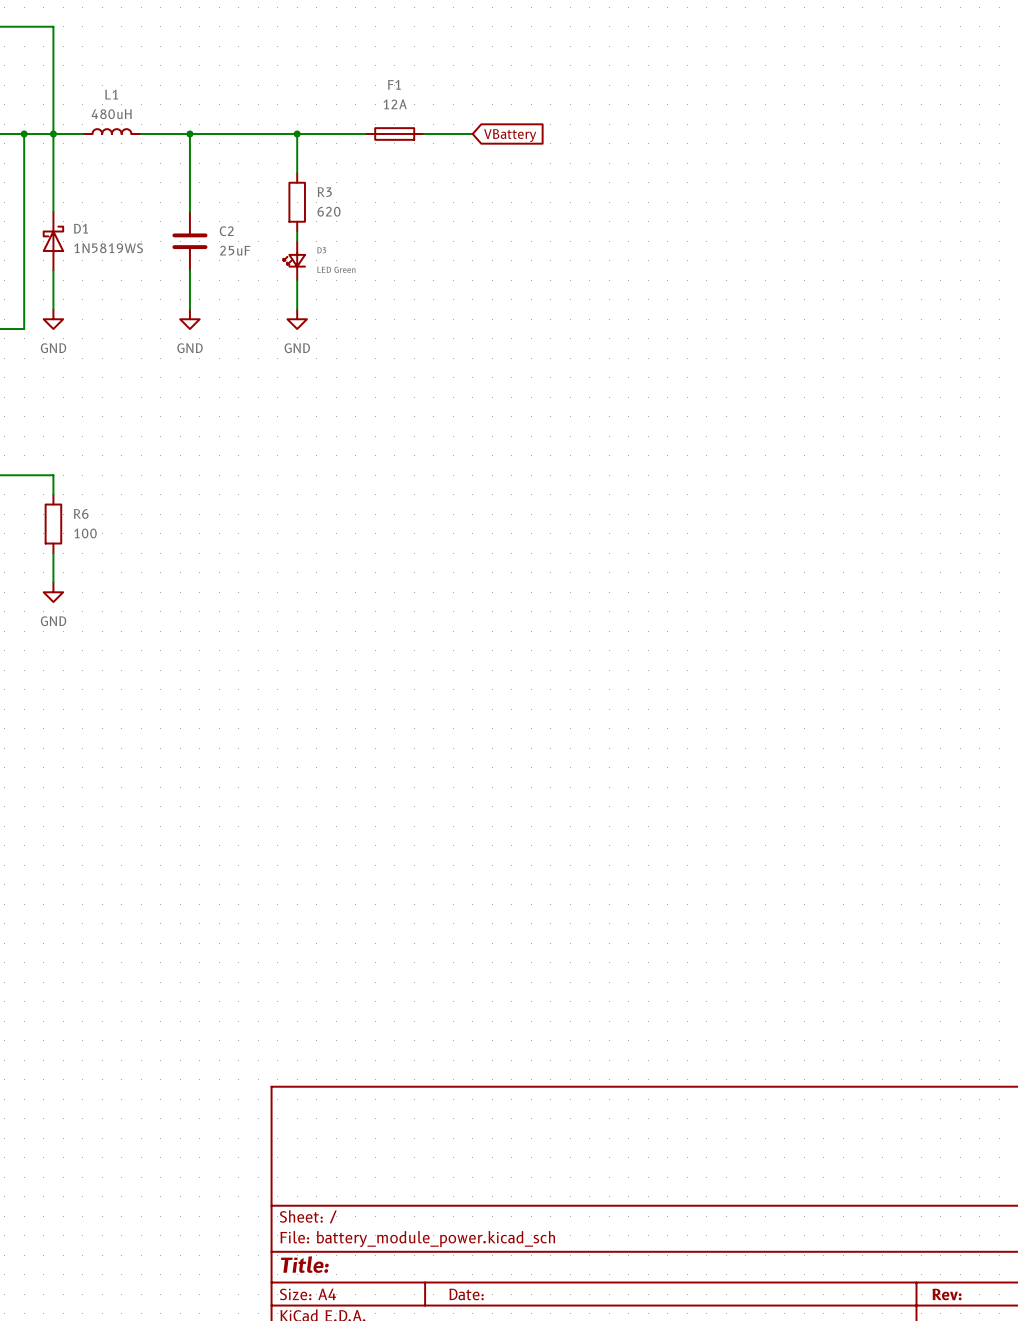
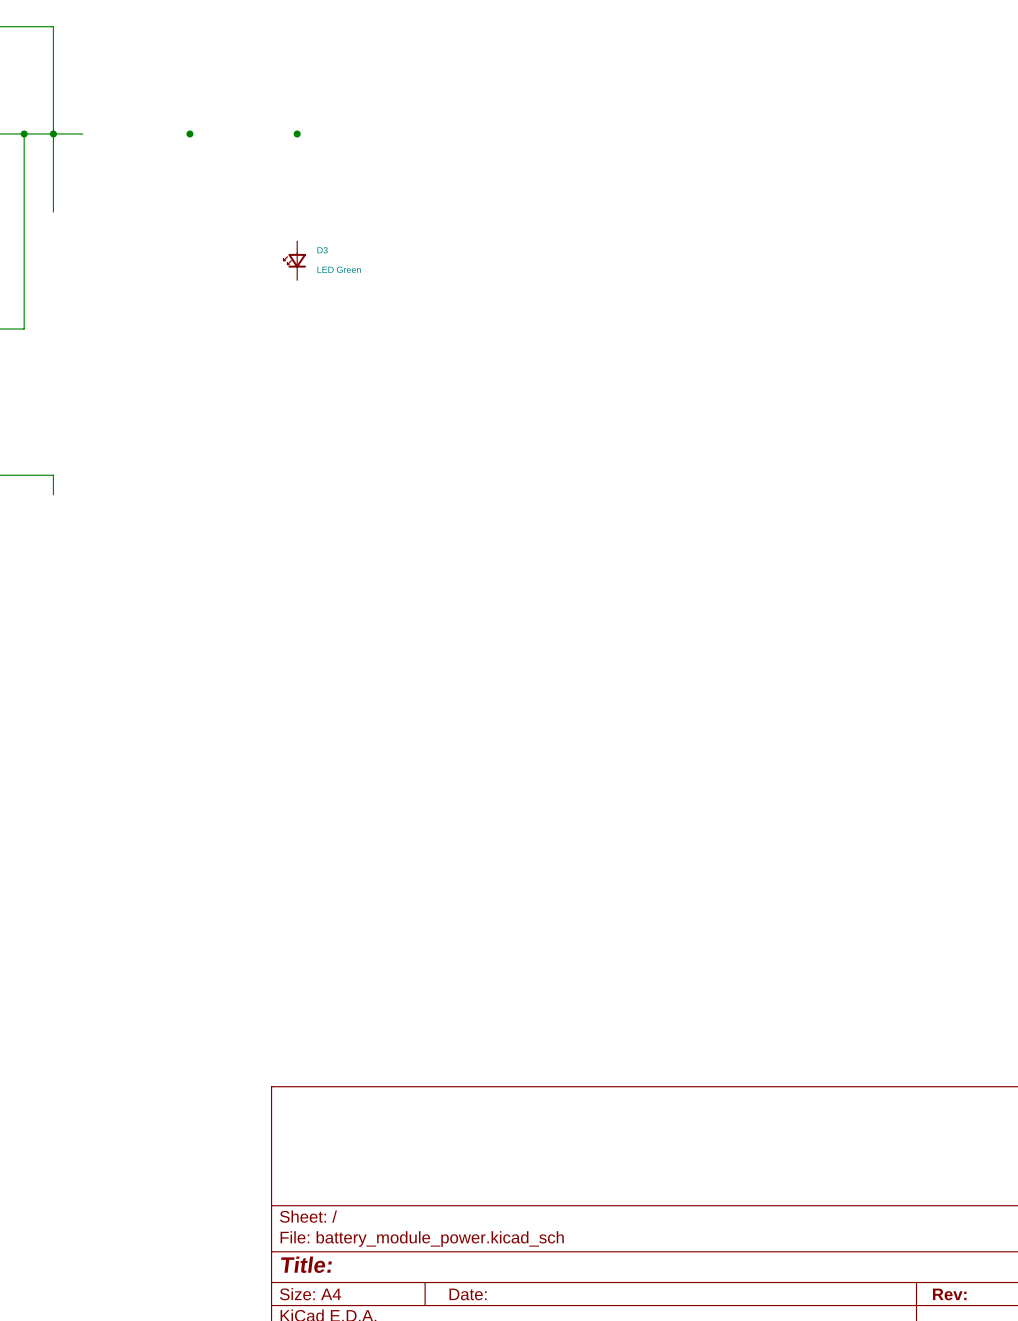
L1: 480uH (111, 131) -> none
wire: (141, 133) (365, 133) -> none
wire: (189, 133) (189, 212) -> none
wire: (297, 133) (297, 172) -> none
F1: 12A (394, 133) -> none
wire: (423, 133) (472, 133) -> none
global label: VBattery (510, 135) -> none
R3: 620 (297, 202) -> none
wire: (297, 231) (297, 241) -> none
D1: 1N5819WS (53, 241) -> none
C2: 25uF (189, 241) -> none
wire: (53, 270) (53, 309) -> none
wire: (189, 270) (189, 309) -> none
wire: (297, 280) (297, 309) -> none
power symbol: GND (53, 319) -> none
power symbol: GND (189, 319) -> none
power symbol: GND (297, 319) -> none
R6: 100 (53, 524) -> none
wire: (53, 553) (53, 582) -> none
power symbol: GND (53, 592) -> none

